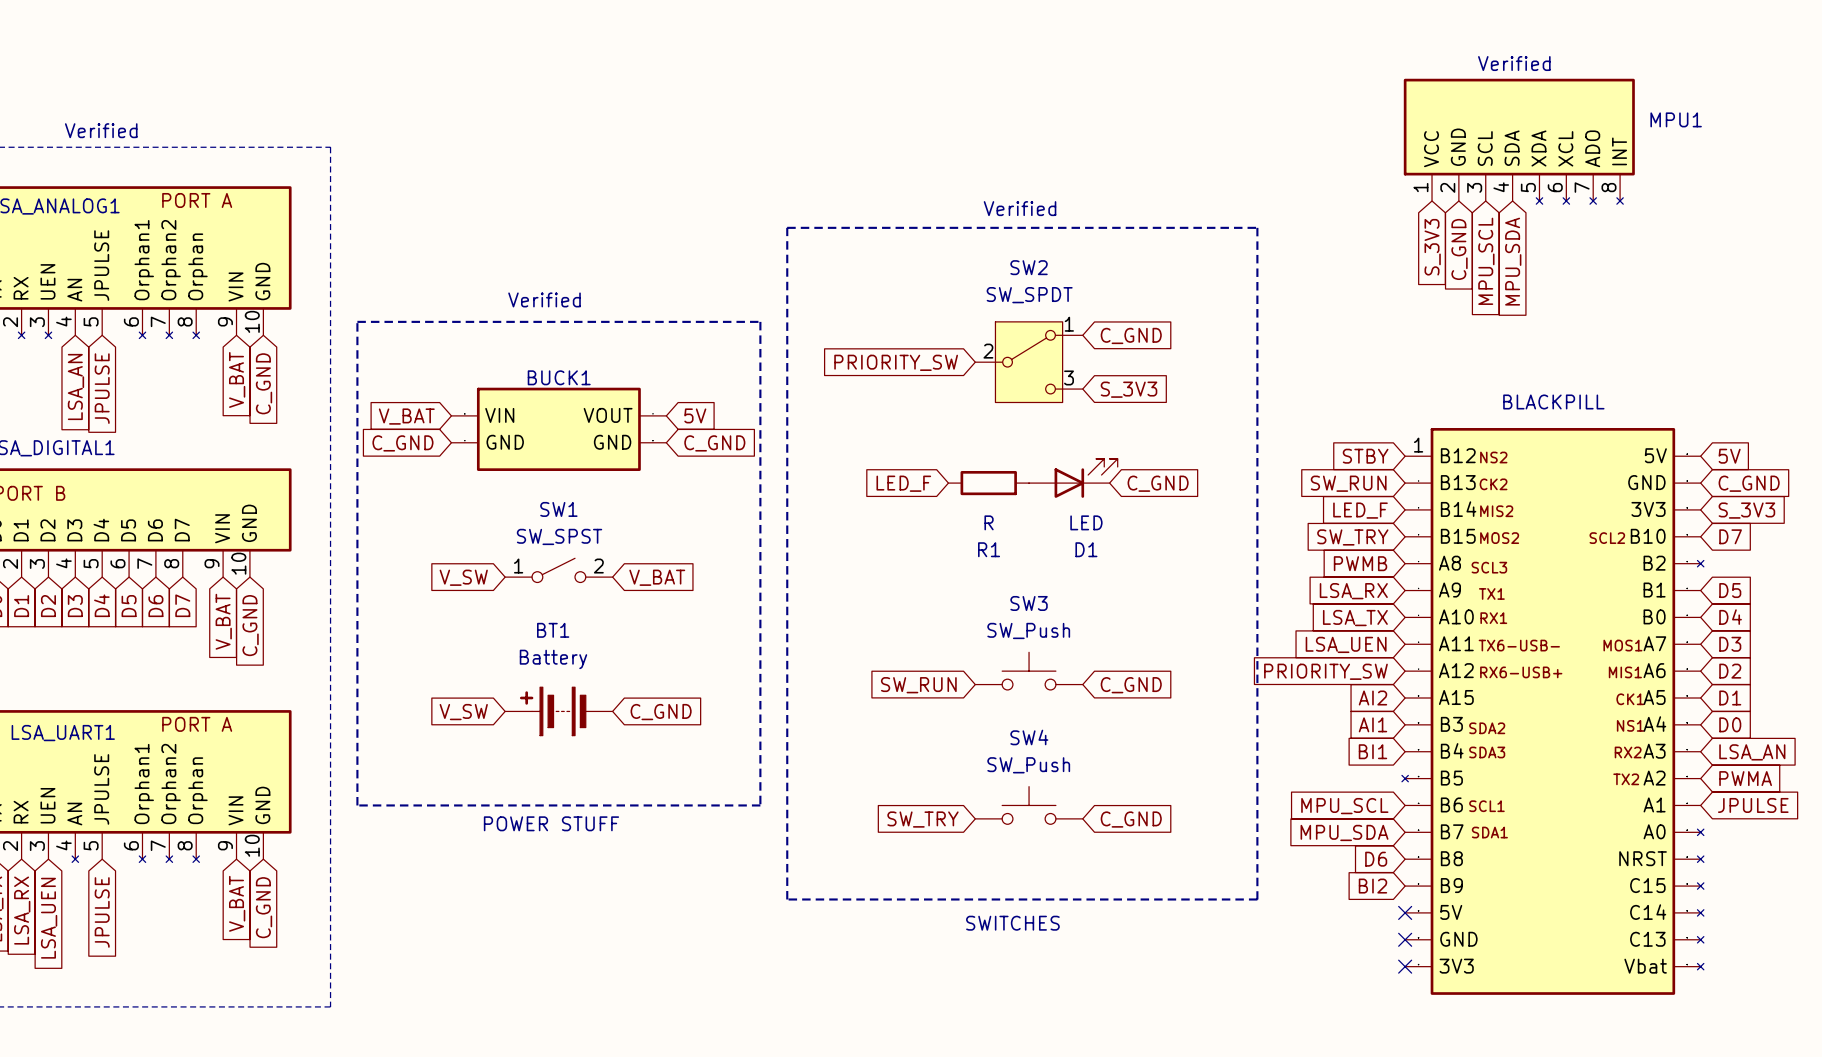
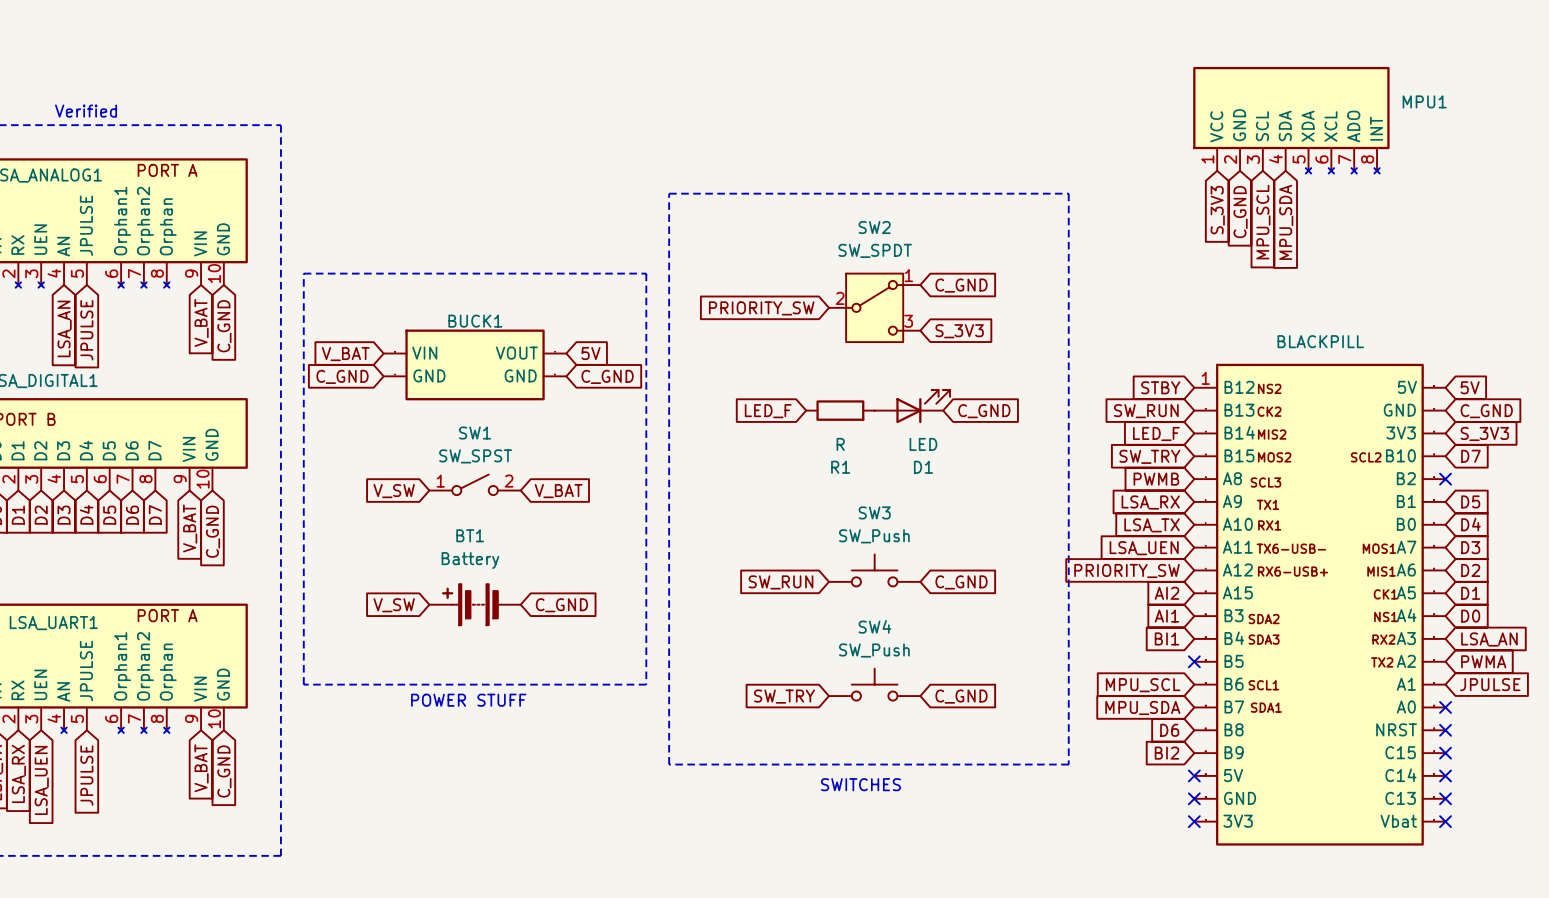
text: Verified (1514, 63) -> none
text: Verified (1020, 208) -> none
text: Verified (544, 299) -> none
part symbol: [1401, 428, 1704, 995] -> [1194, 363, 1446, 846]
no-connect mark: none -> (1445, 479)
no-connect mark: none -> (1194, 661)
no-connect mark: none -> (1445, 707)
no-connect mark: none -> (1445, 730)
no-connect mark: none -> (1445, 753)
no-connect mark: none -> (1445, 775)
no-connect mark: none -> (1445, 798)
no-connect mark: none -> (1445, 821)

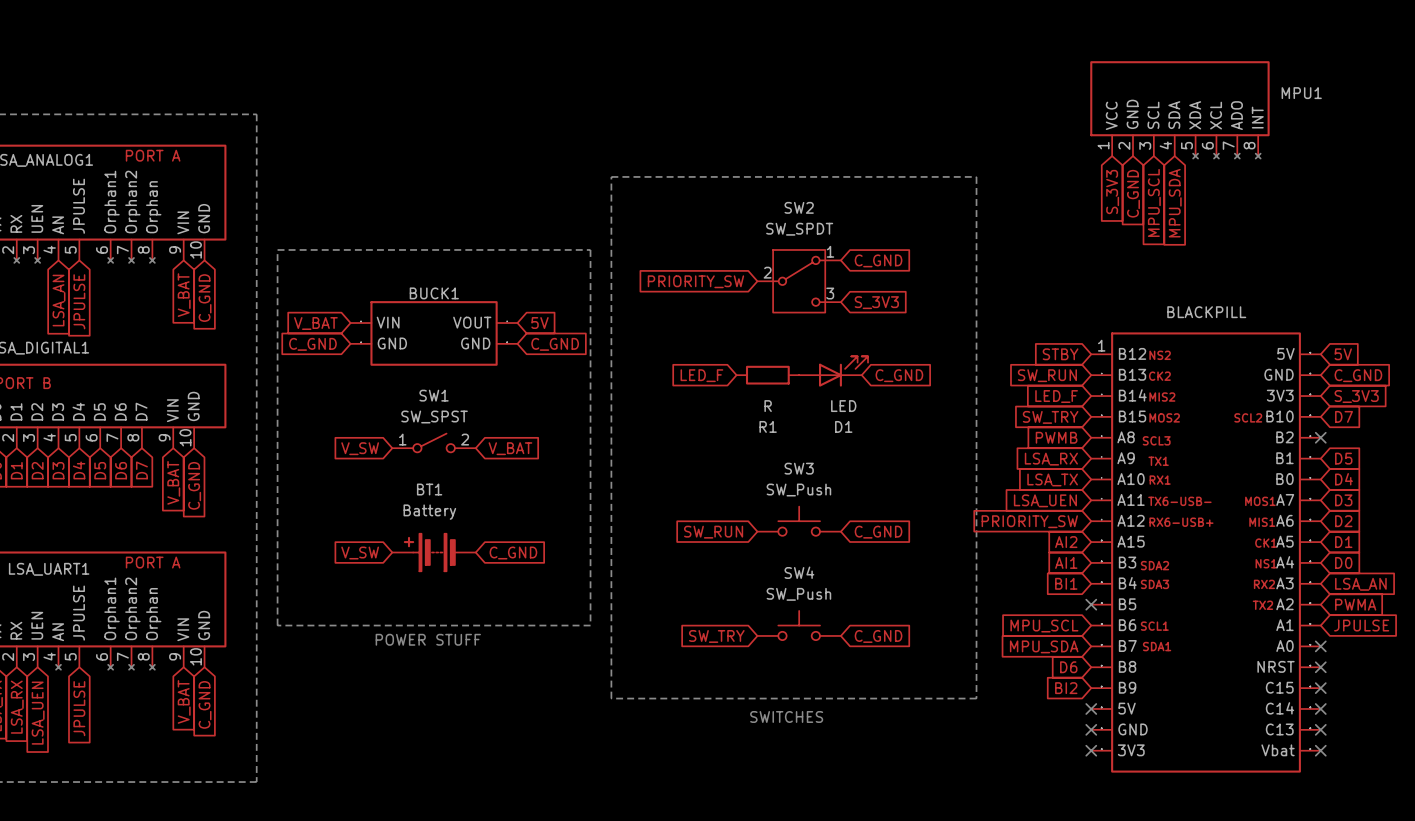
text: Verified (86, 111) -> none

